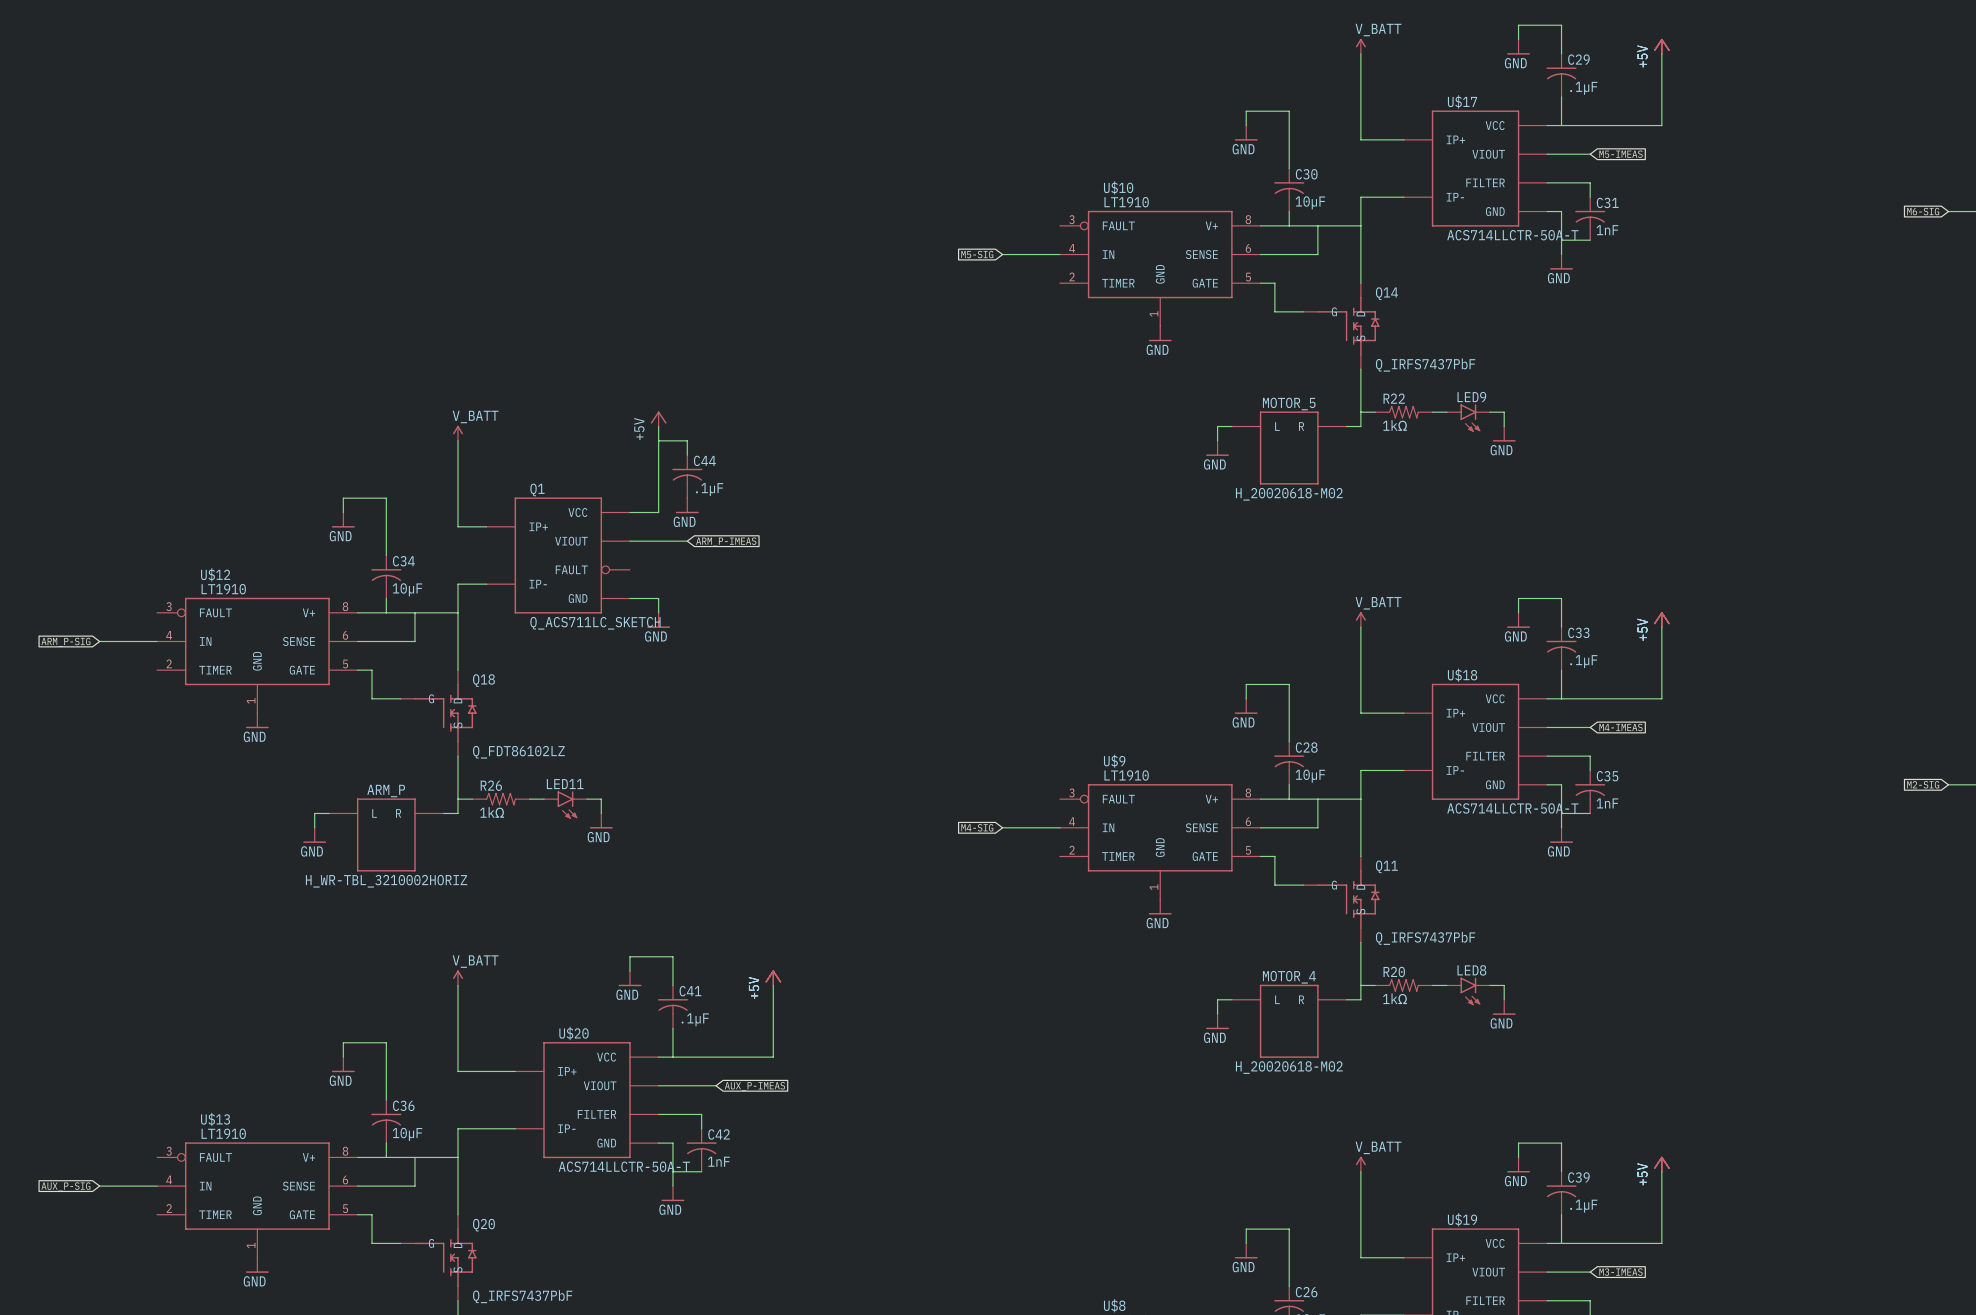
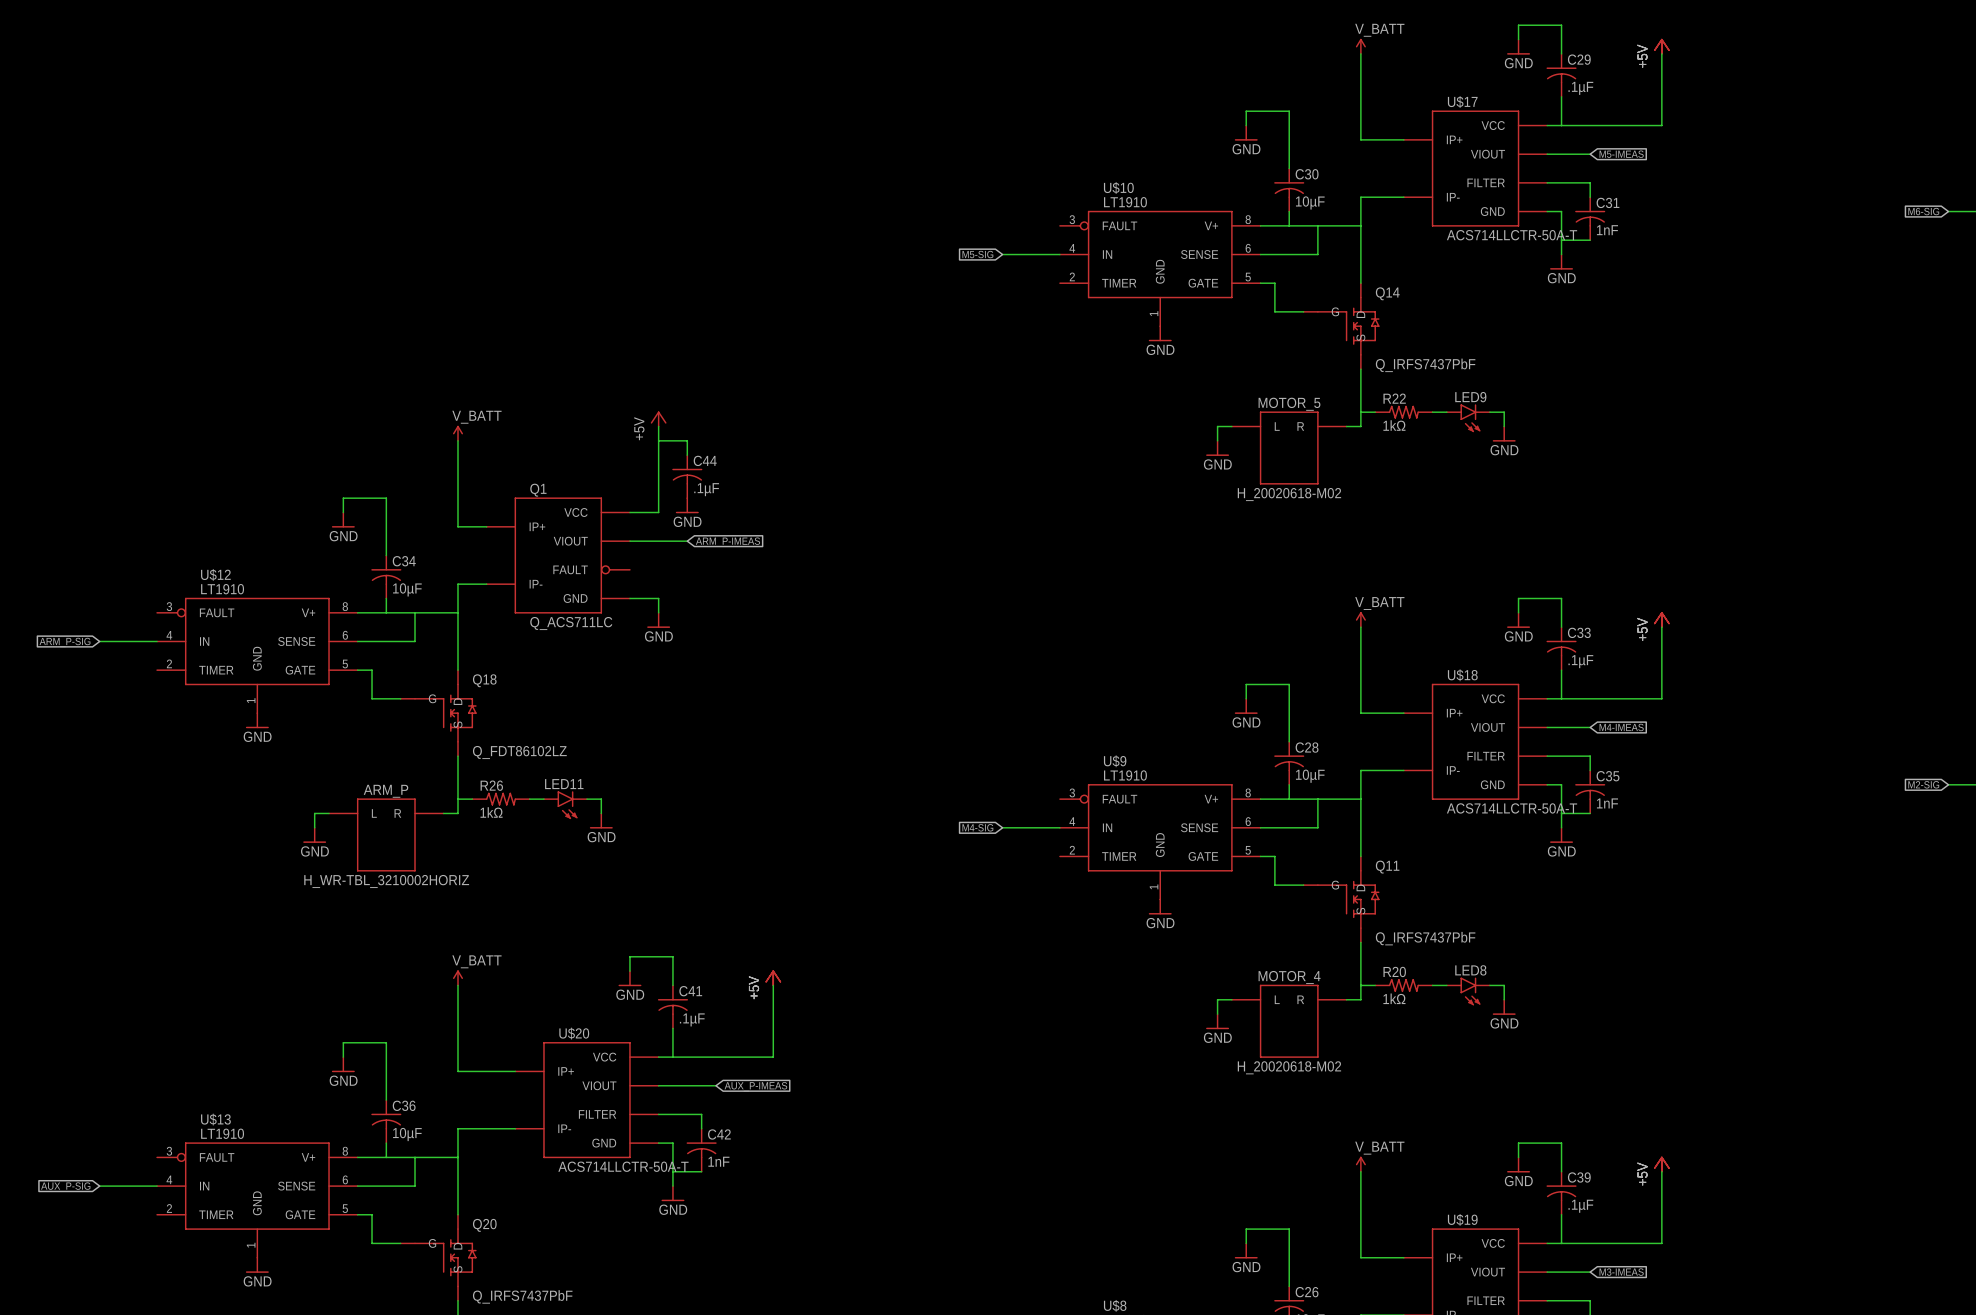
Q1 value: Q_ACS711LC_SKETCH (595, 623) -> Q_ACS711LC (571, 623)

